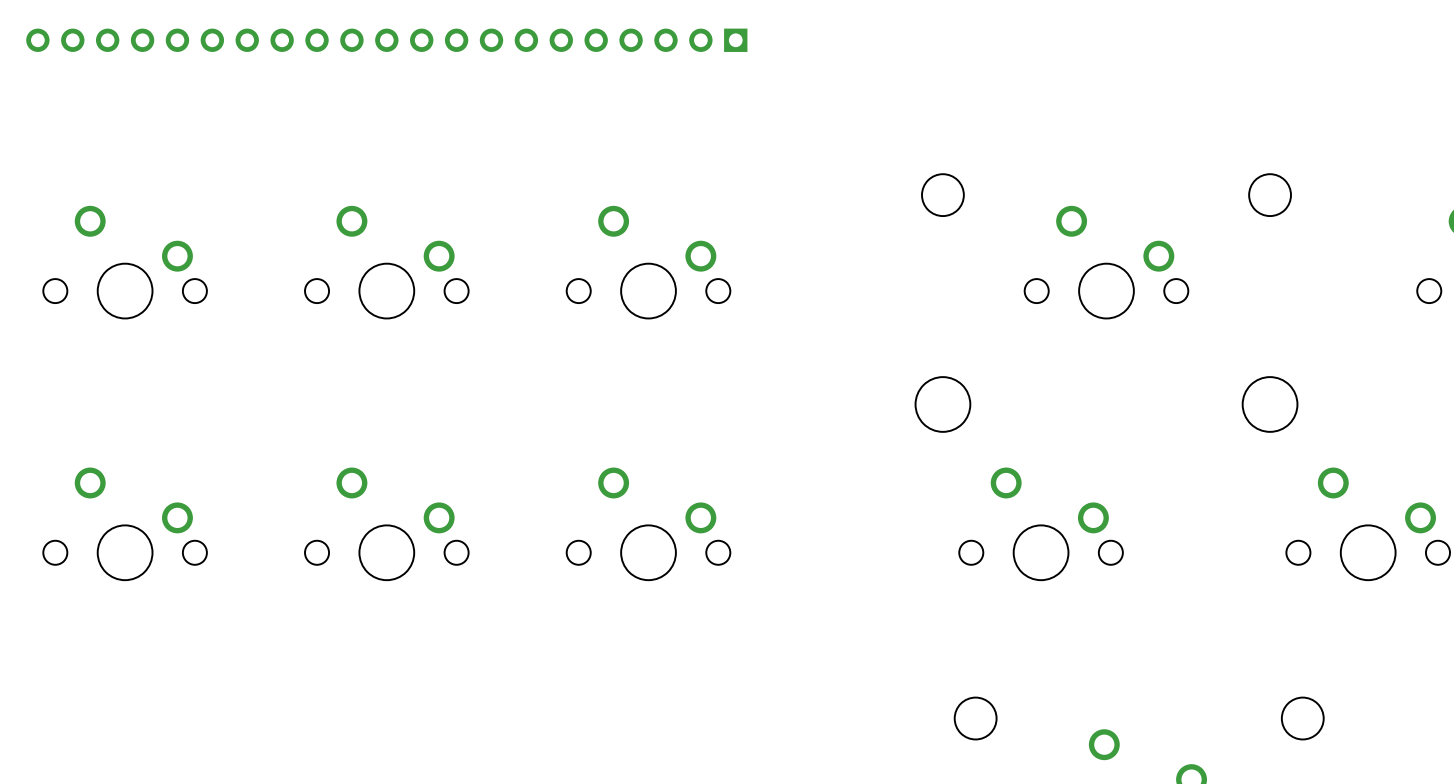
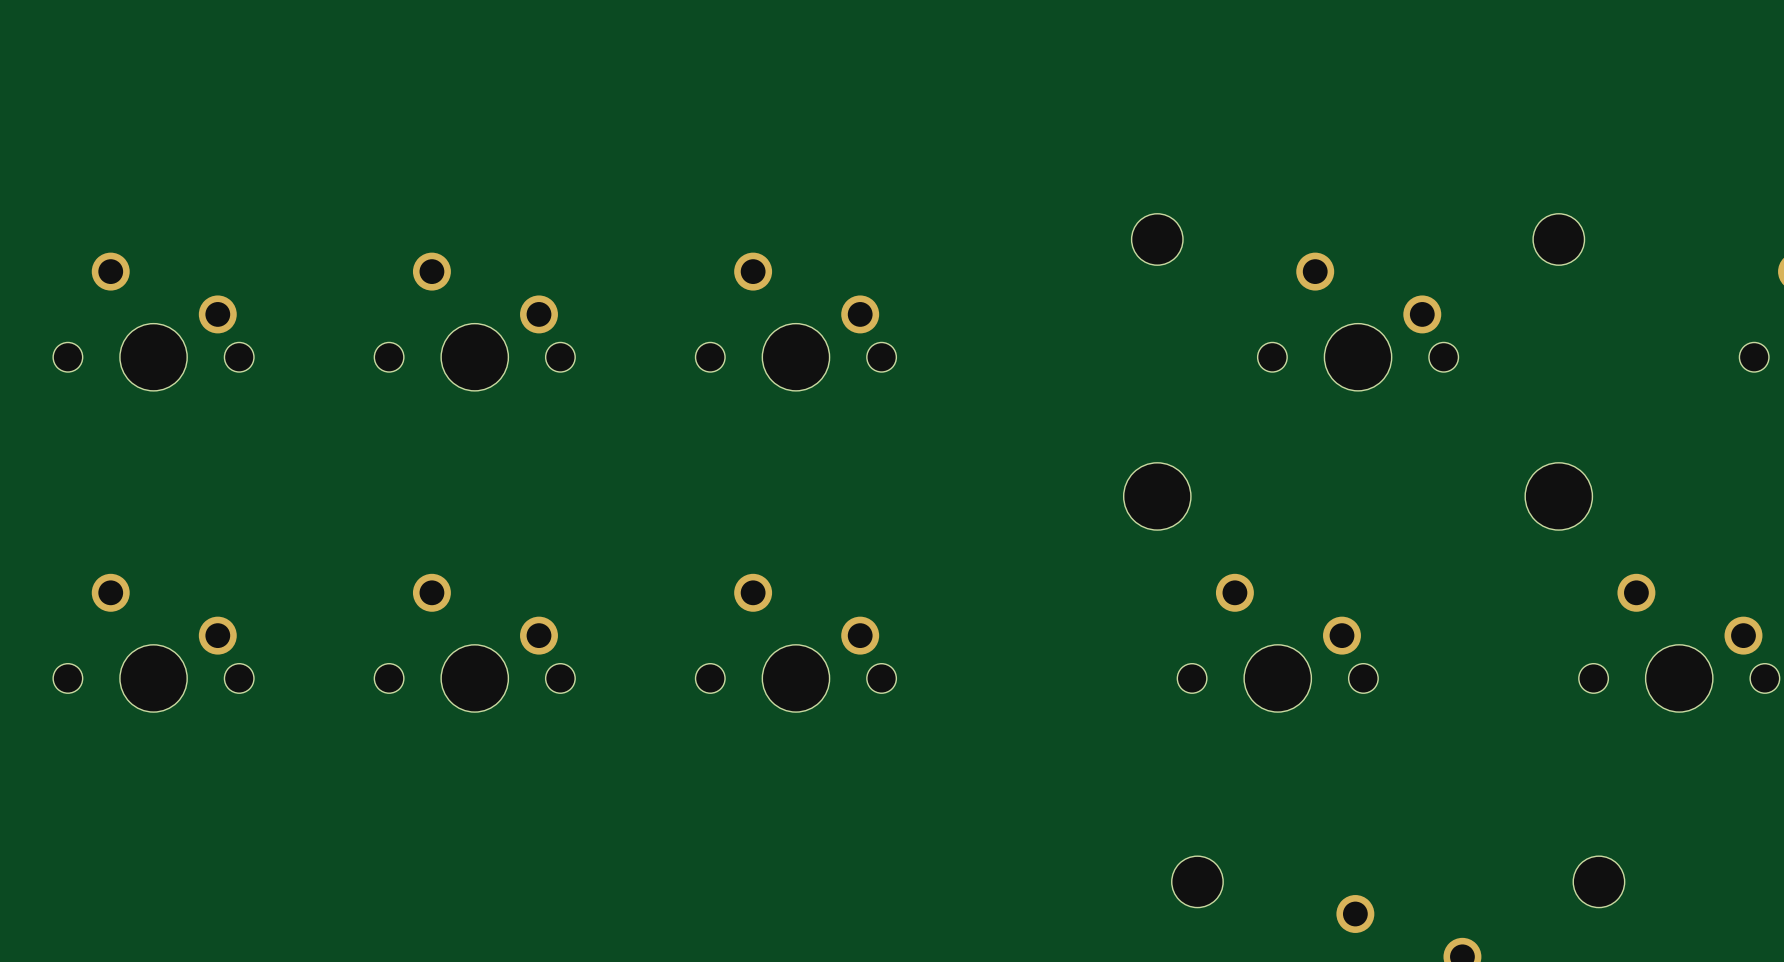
part: (386, 40) -> none

